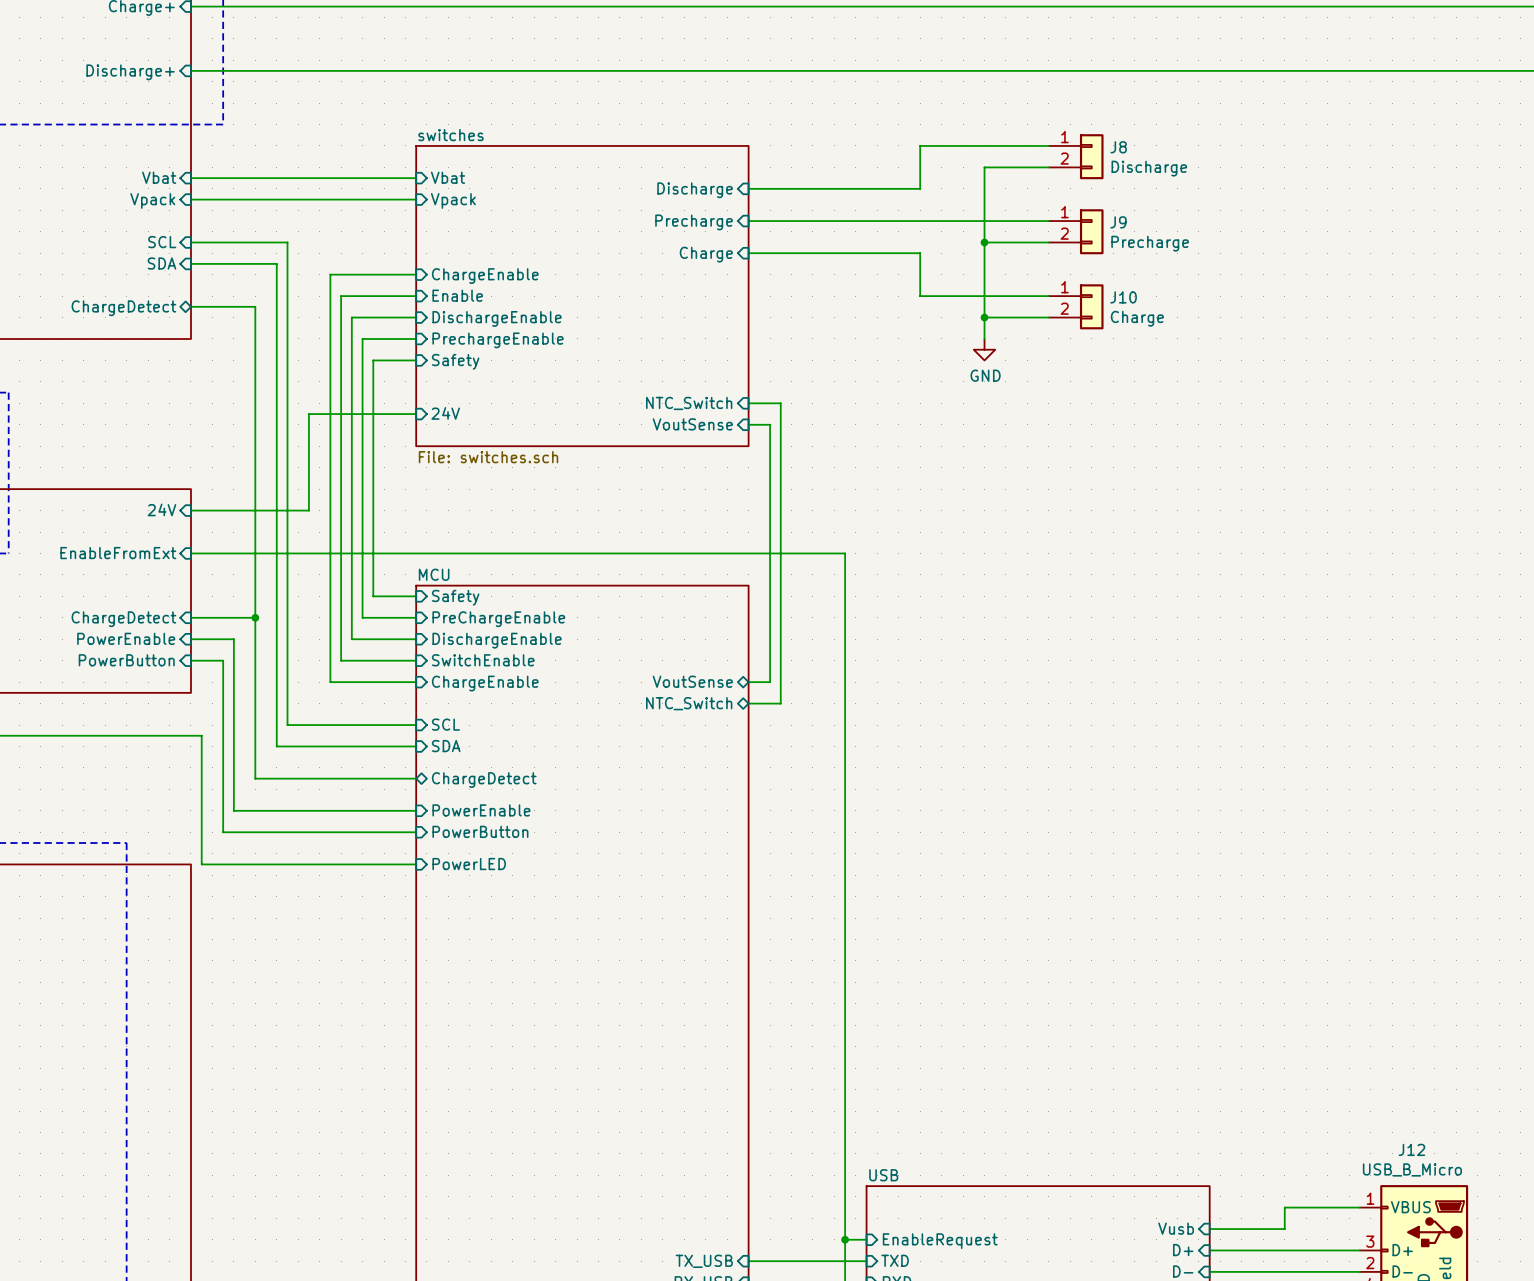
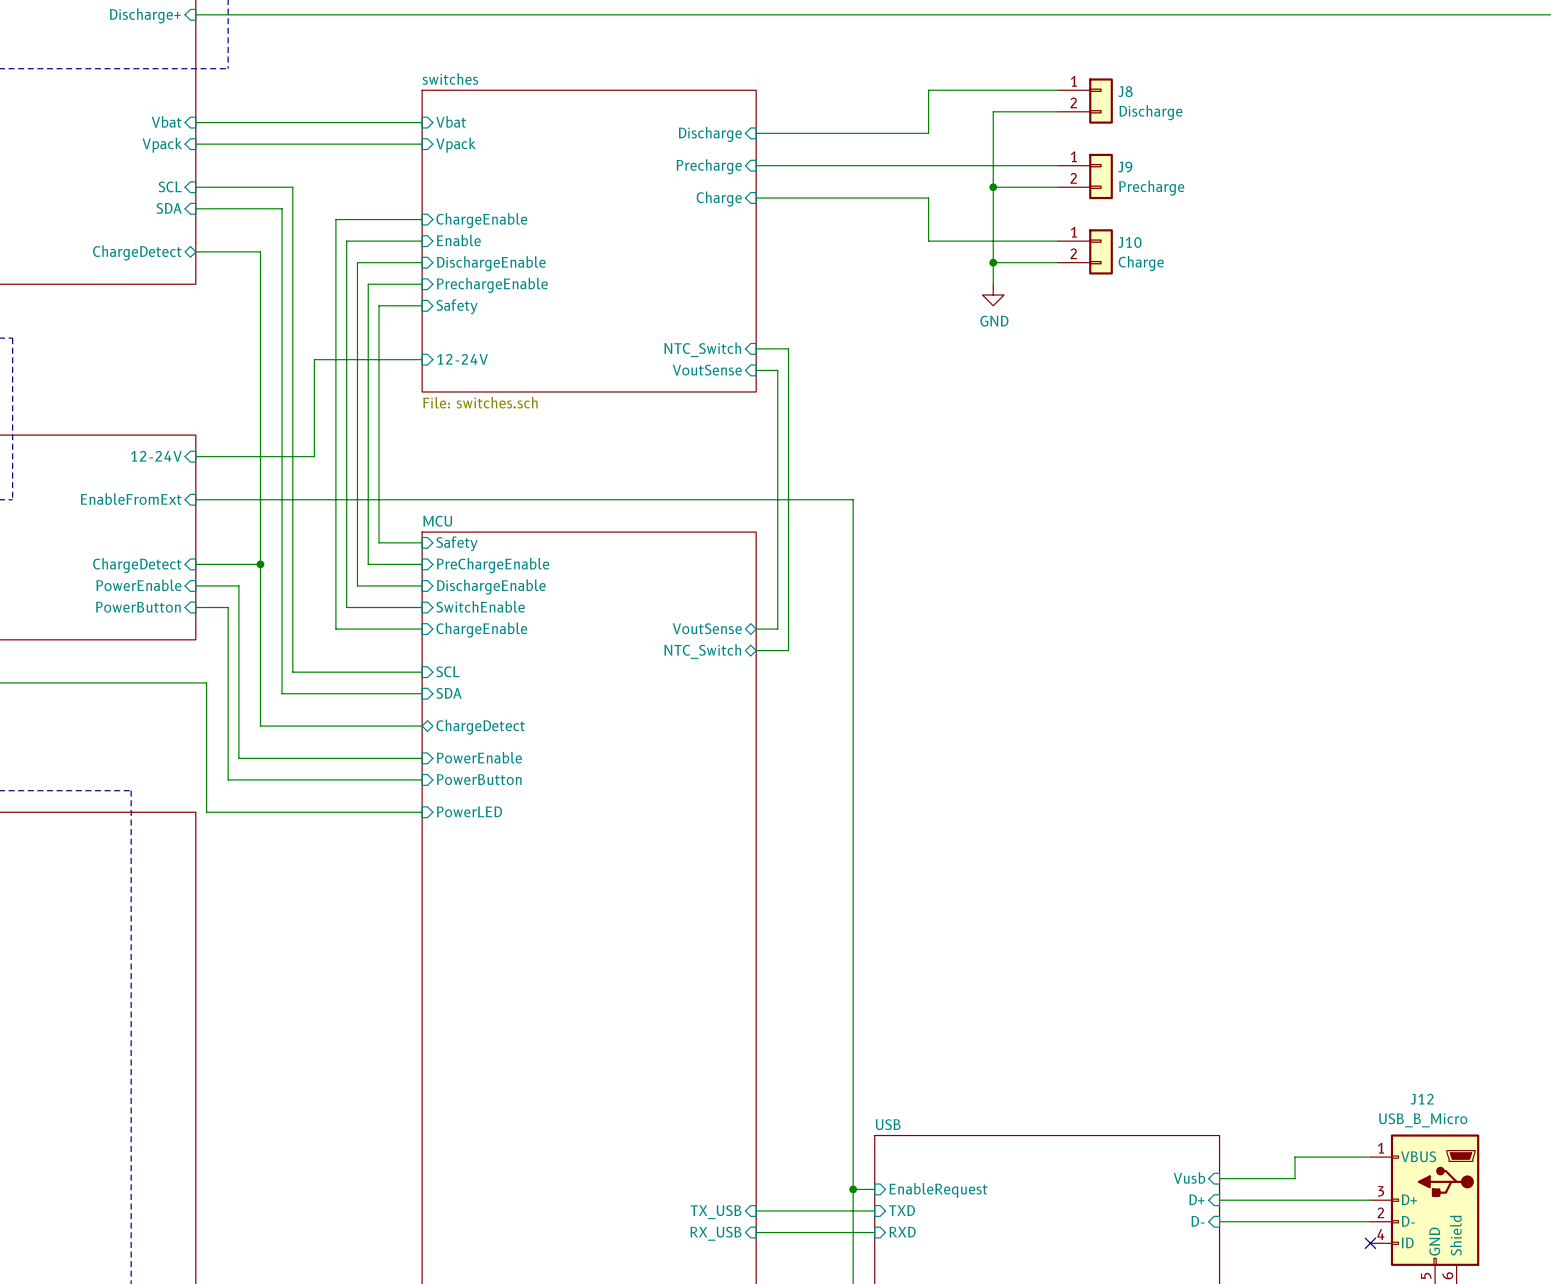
sheet pin: 24V (445, 413) -> 12-24V (462, 359)
sheet pin: 24V (161, 509) -> 12-24V (156, 456)

